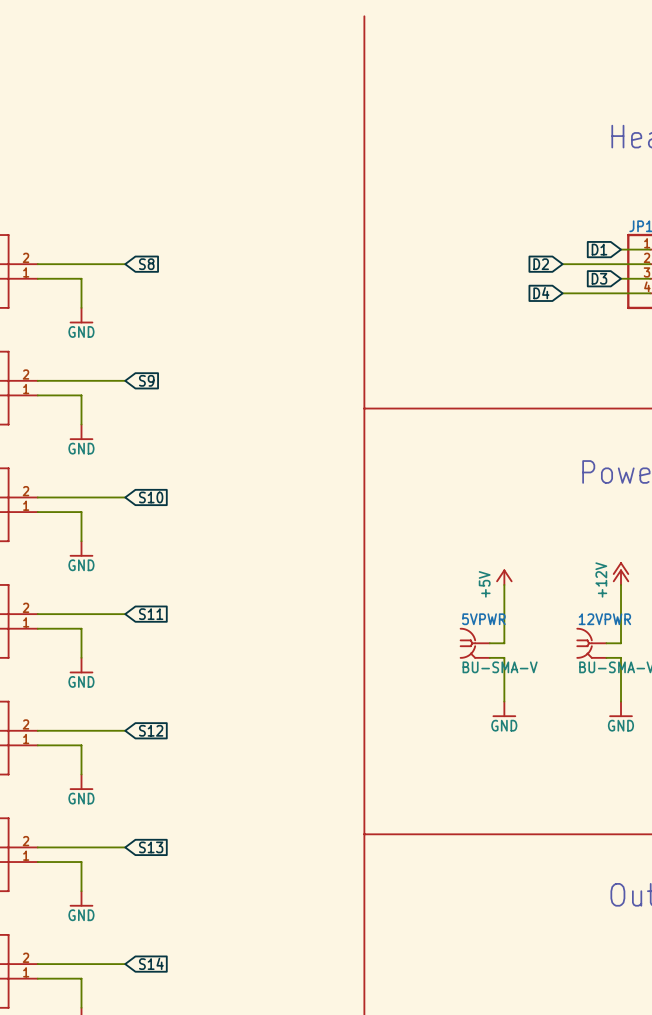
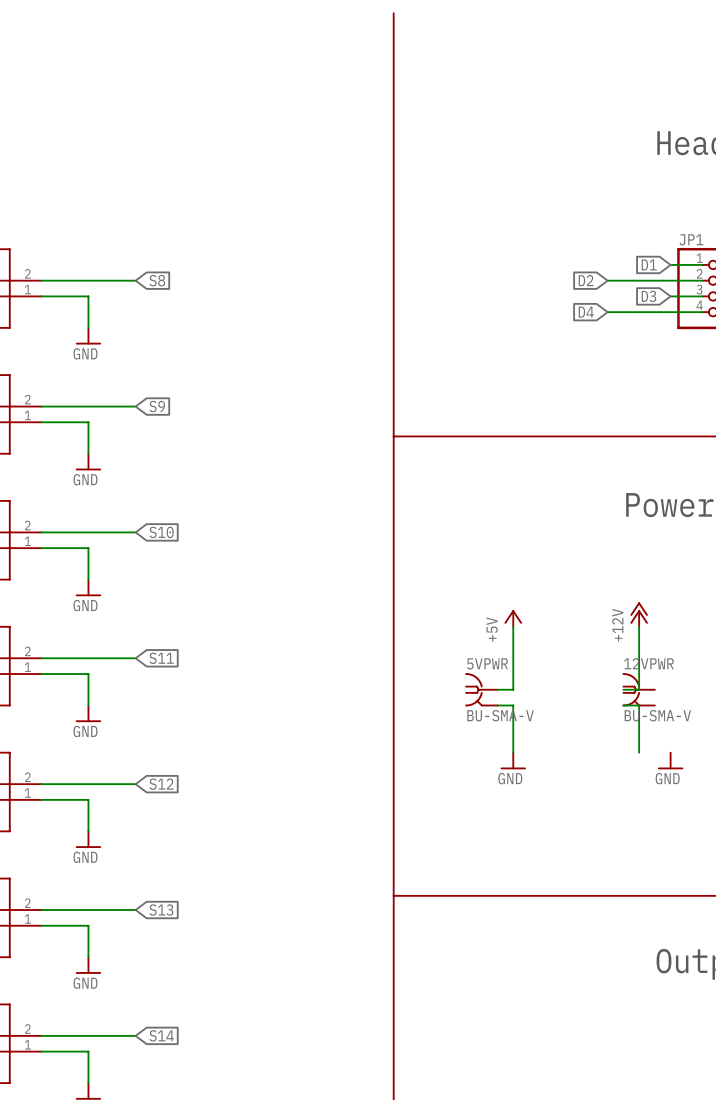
power symbol position: +12V (621, 573) -> +12V (639, 614)
power symbol position: +5V (504, 577) -> +5V (513, 618)
wire: (504, 584) (504, 643) (489, 643) -> (513, 626) (513, 689) (497, 689)
wire: (621, 584) (621, 643) (606, 643) -> (639, 626) (639, 689) (623, 689)
5VPWR position: (474, 643) -> (481, 689)
wire: (489, 657) (504, 657) (504, 701) -> (497, 705) (513, 705) (513, 752)
wire: (606, 657) (621, 657) (621, 701) -> (623, 705) (639, 705) (639, 752)
power symbol position: GND (504, 709) -> GND (513, 760)

